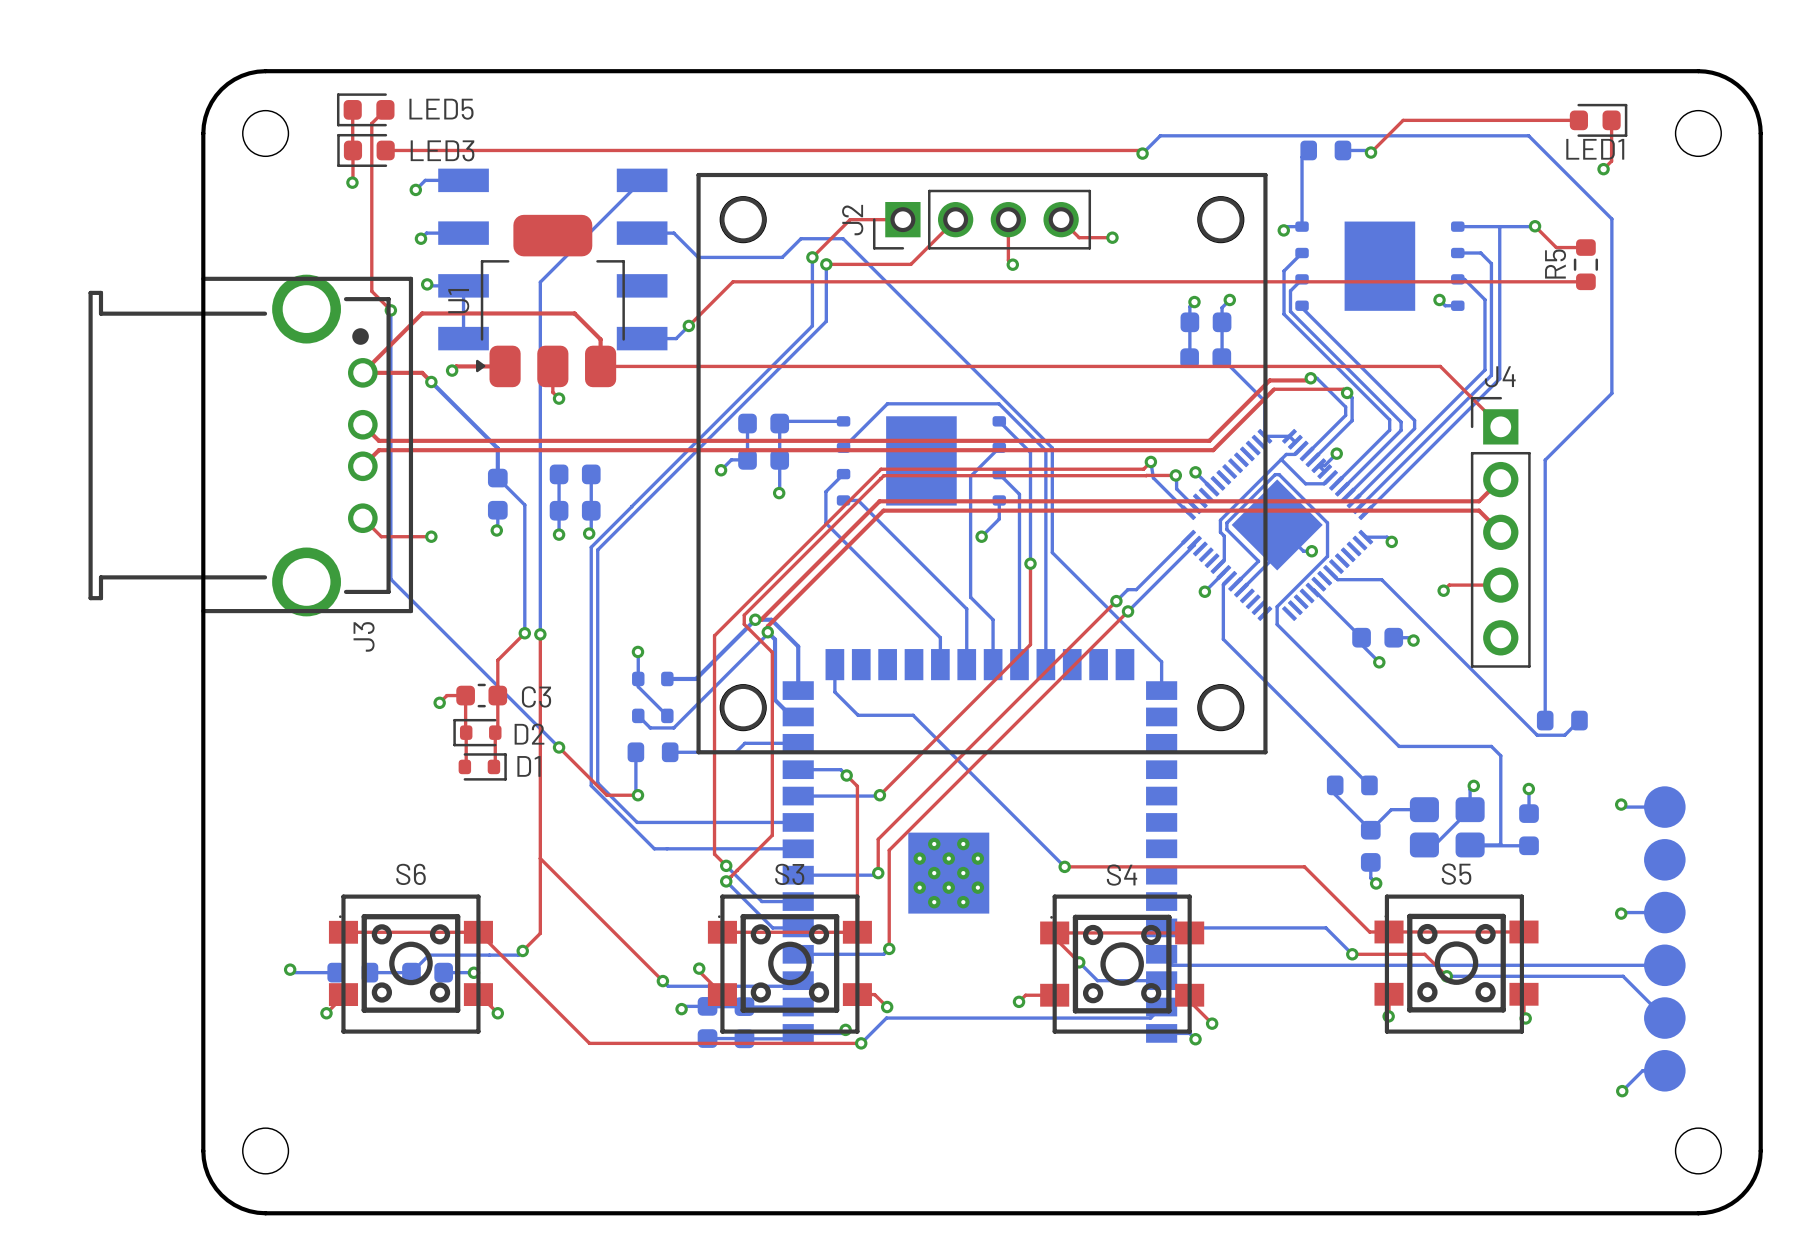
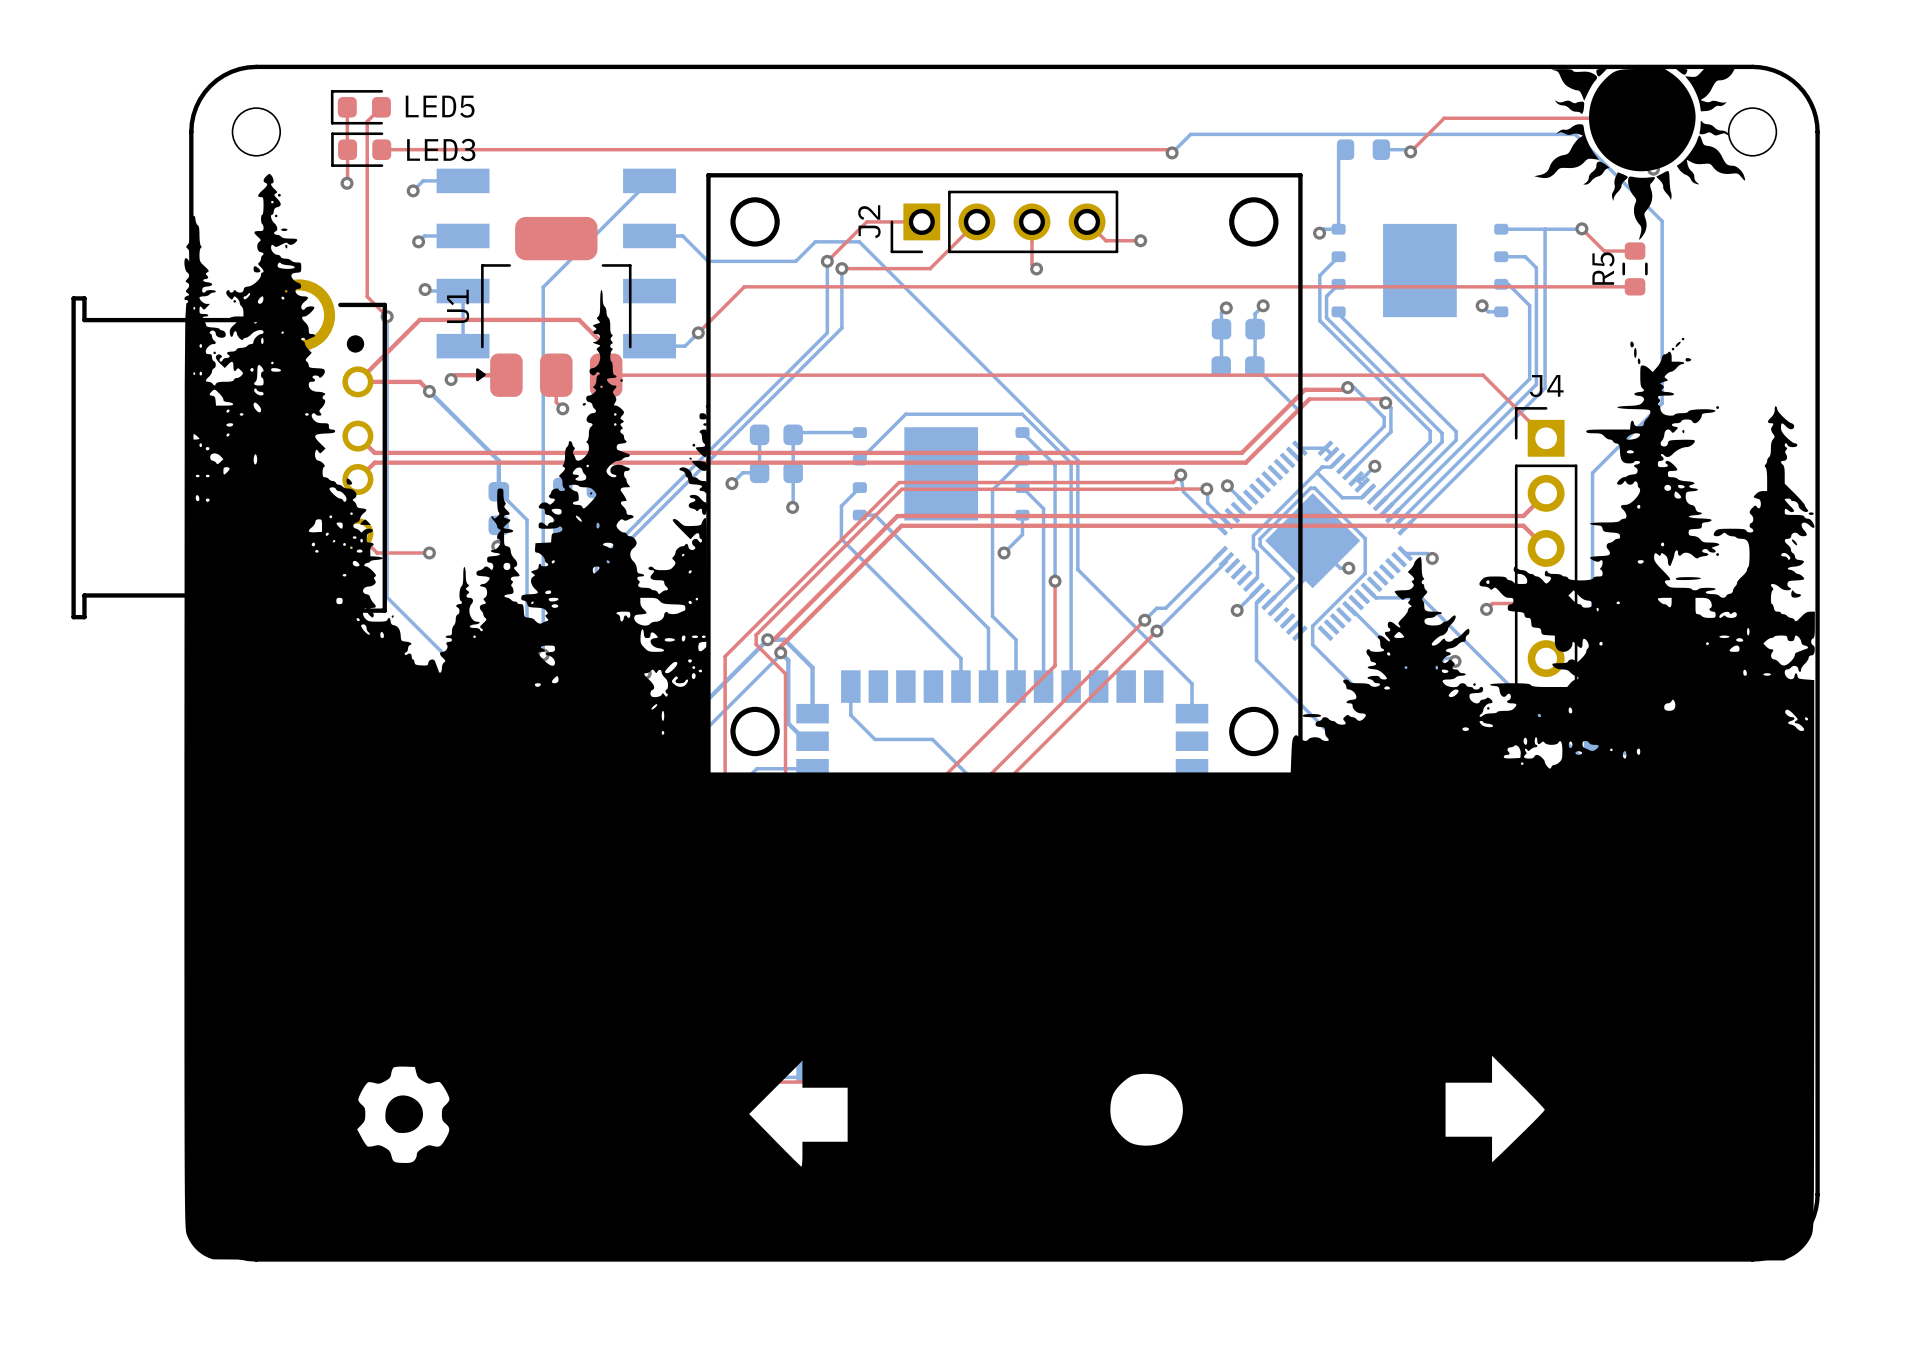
drawing: none -> [184, 68, 1815, 1261]
LED1 name: LED1 (1595, 149) -> none
line: (203, 278) (410, 278) (410, 611) (203, 611) -> none
S6 name: S6 (410, 874) -> none
S5 name: S5 (1456, 874) -> none
line: (343, 896) (478, 896) (478, 1031) (343, 1031) (343, 896) -> none
line: (722, 896) (857, 896) (857, 1031) (722, 1031) (722, 896) -> none
line: (1054, 896) (1054, 1031) (1189, 1031) (1189, 896) (1054, 896) -> none
line: (1386, 896) (1521, 896) (1521, 1031) (1386, 1031) (1386, 896) -> none

